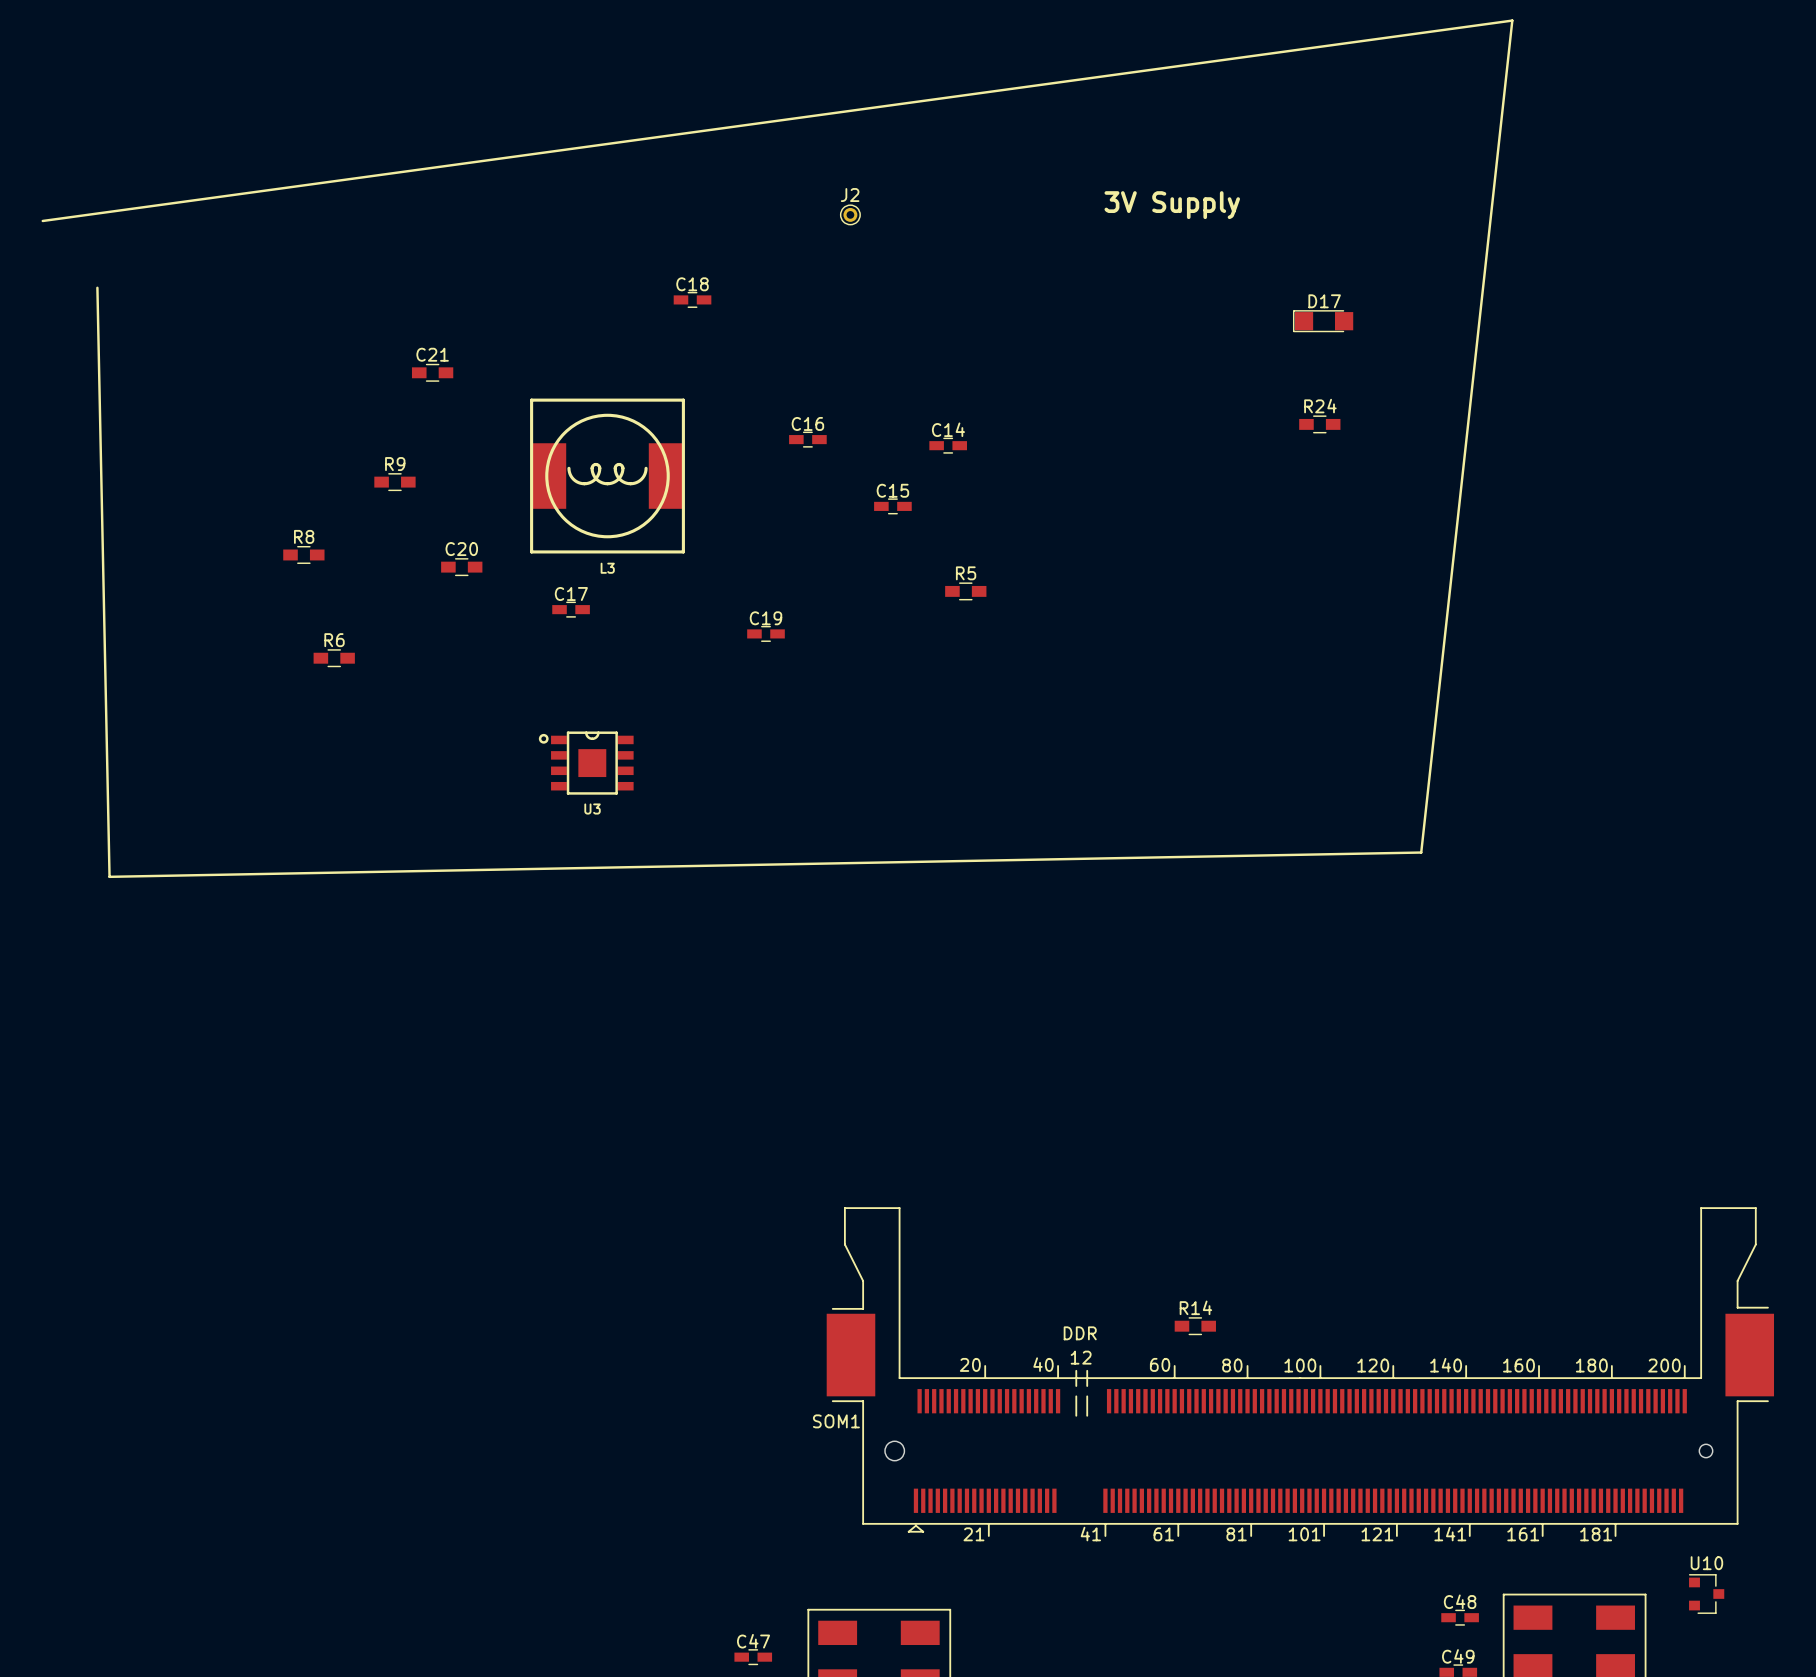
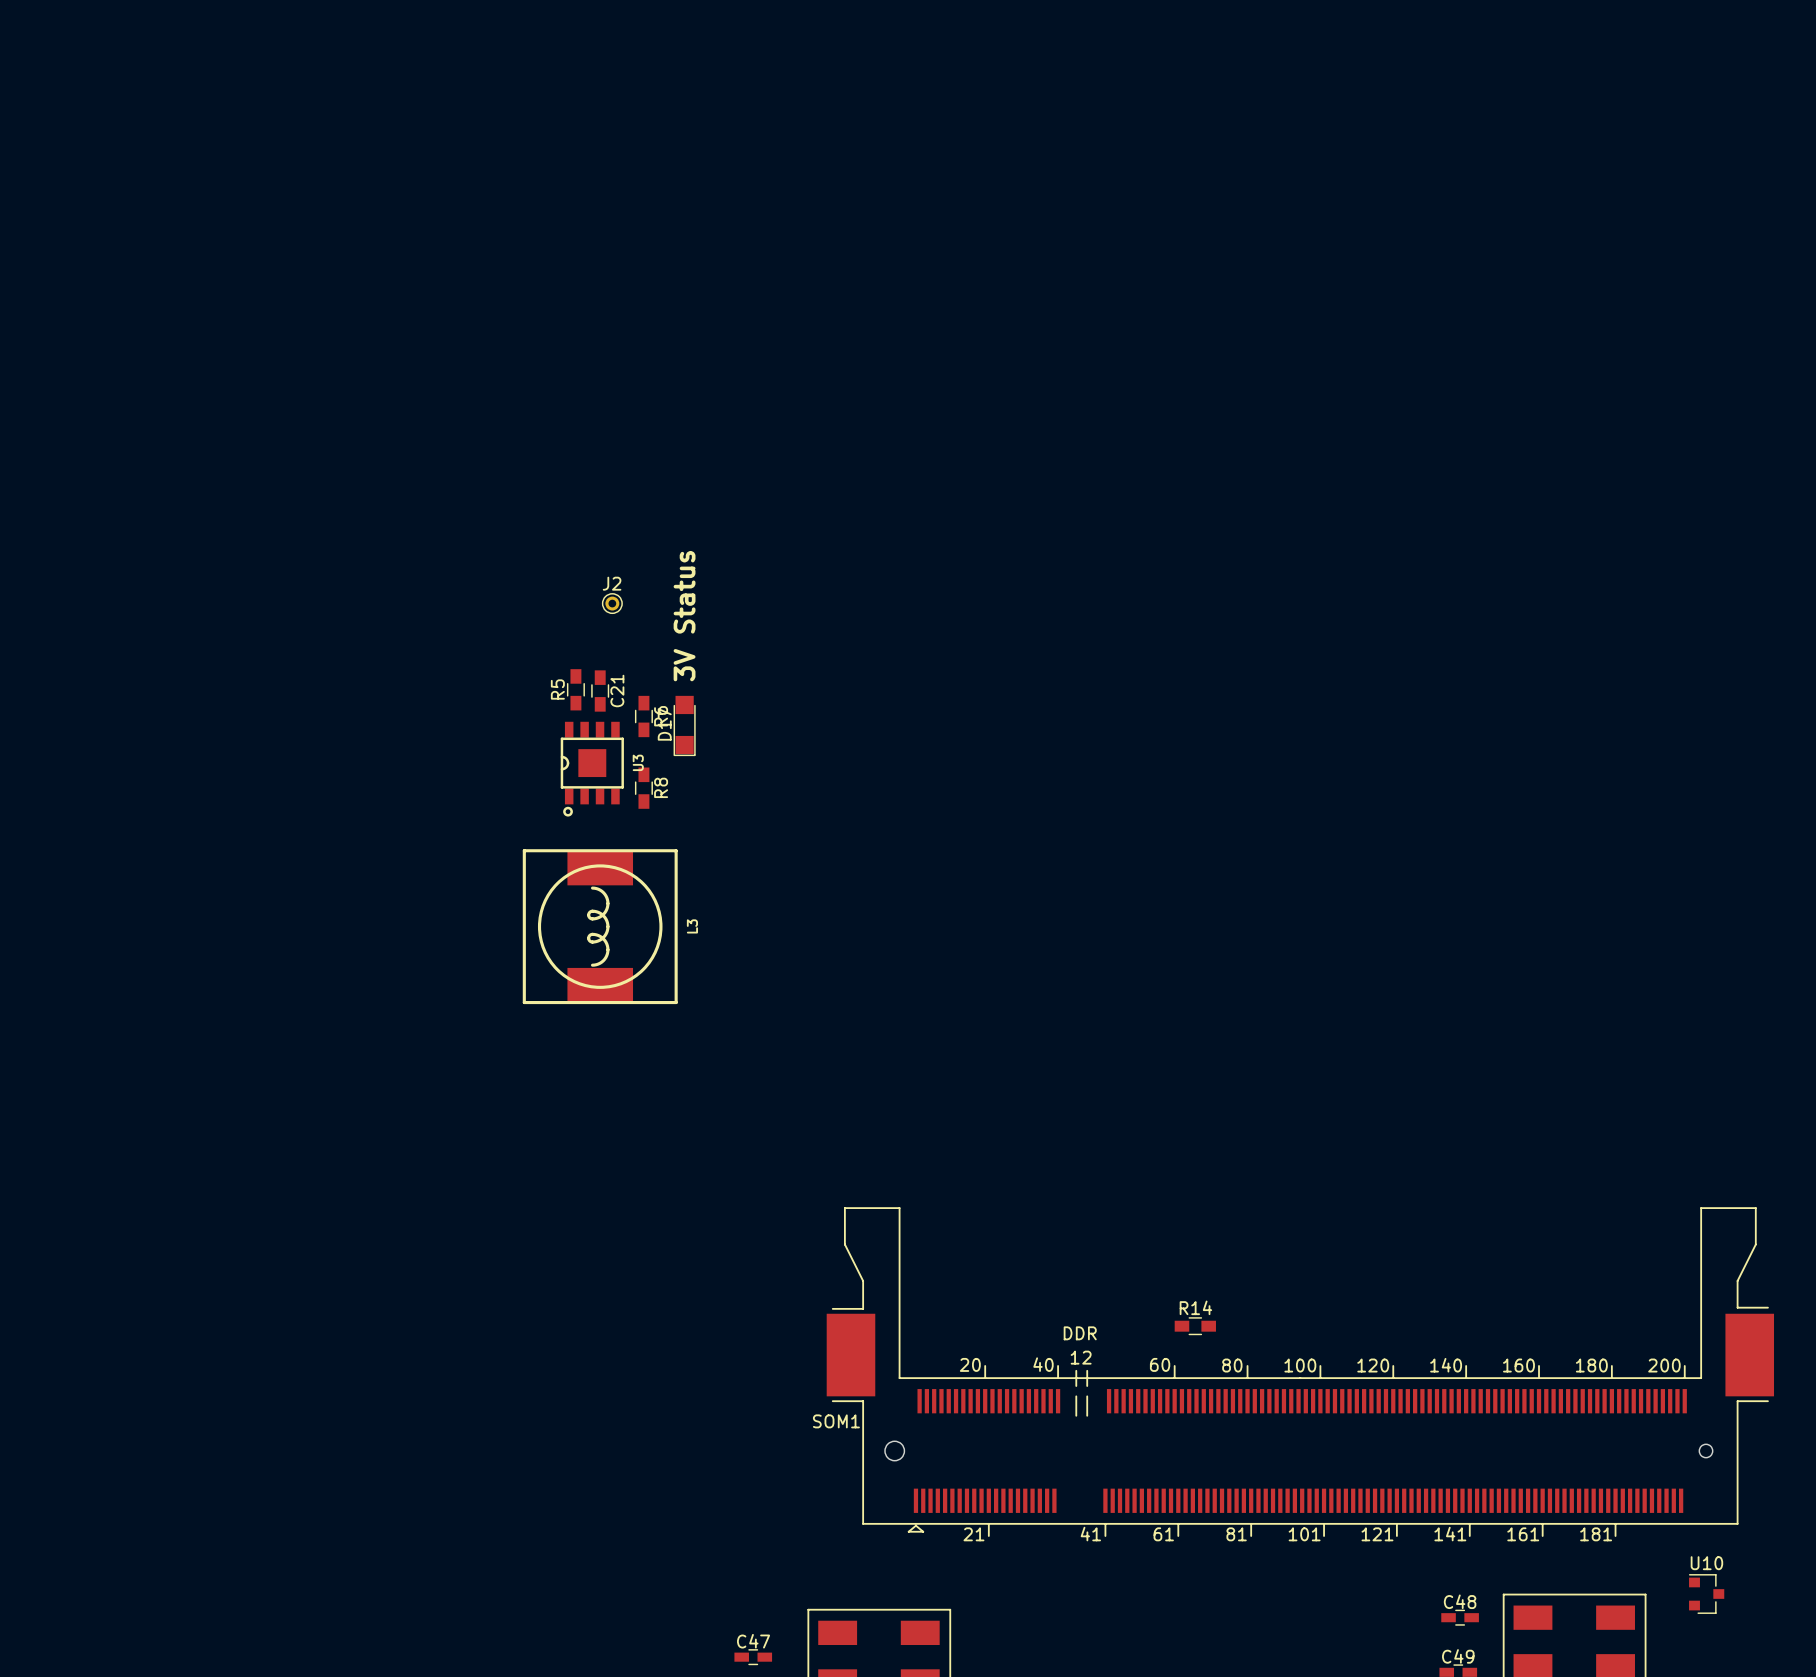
text: 3V Supply (1172, 205) -> none
J2 position: (850, 214) -> (612, 603)
line: (42, 220) (1512, 20) (1421, 852) (109, 876) (97, 287) -> none
C18: (692, 299) -> none
D17 rotation: 0° (1323, 321) -> 90° counterclockwise (684, 725)
D17 position: (1323, 321) -> (684, 725)
C21 rotation: 0° (432, 372) -> 90° clockwise (600, 691)
C21 position: (432, 372) -> (600, 691)
R24: (1319, 424) -> none
C16: (807, 439) -> none
C14: (948, 445) -> none
L3 rotation: 0° (607, 476) -> 90° counterclockwise (600, 926)
L3 position: (607, 476) -> (600, 926)
R9: (394, 482) -> none
C15: (892, 506) -> none
R8 rotation: 0° (303, 554) -> 90° clockwise (643, 788)
R8 position: (303, 554) -> (643, 788)
C20: (461, 567) -> none
R5 name position: R5 (966, 573) -> R5 (557, 689)
R5 rotation: 0° (965, 591) -> 90° clockwise (575, 689)
R5 position: (965, 591) -> (575, 689)
C17: (571, 609) -> none
text: none -> 3V Status (684, 616)
C19: (766, 633) -> none
R6 rotation: 0° (334, 658) -> 90° clockwise (643, 716)
R6 position: (334, 658) -> (643, 716)
U3 rotation: 0° (586, 763) -> 90° counterclockwise (592, 769)

